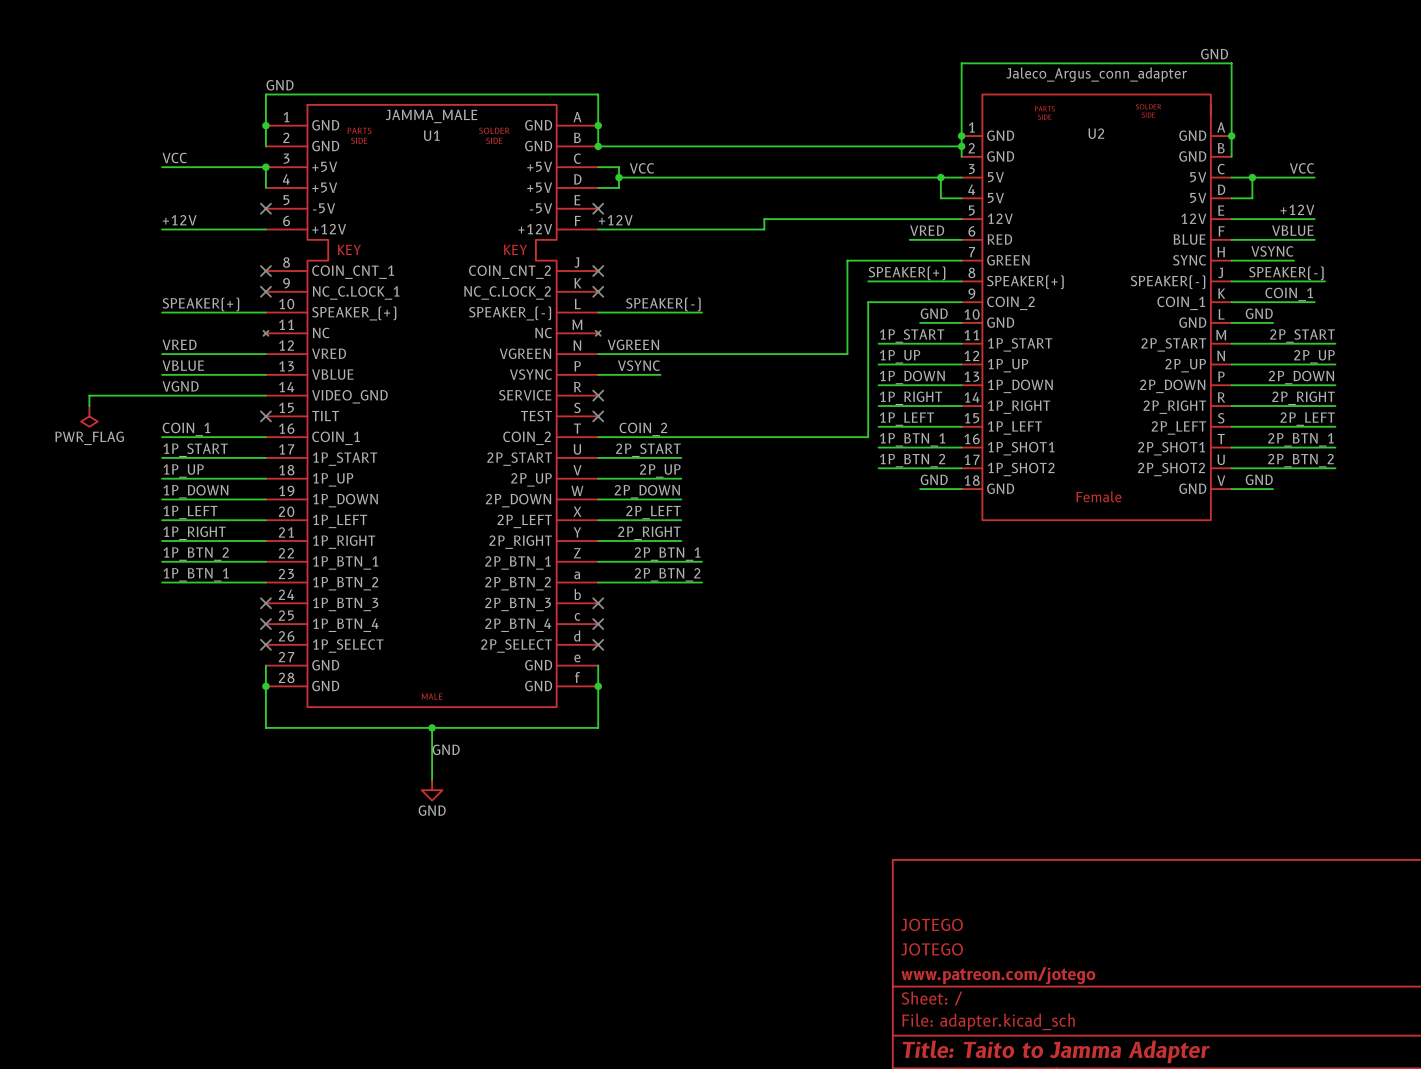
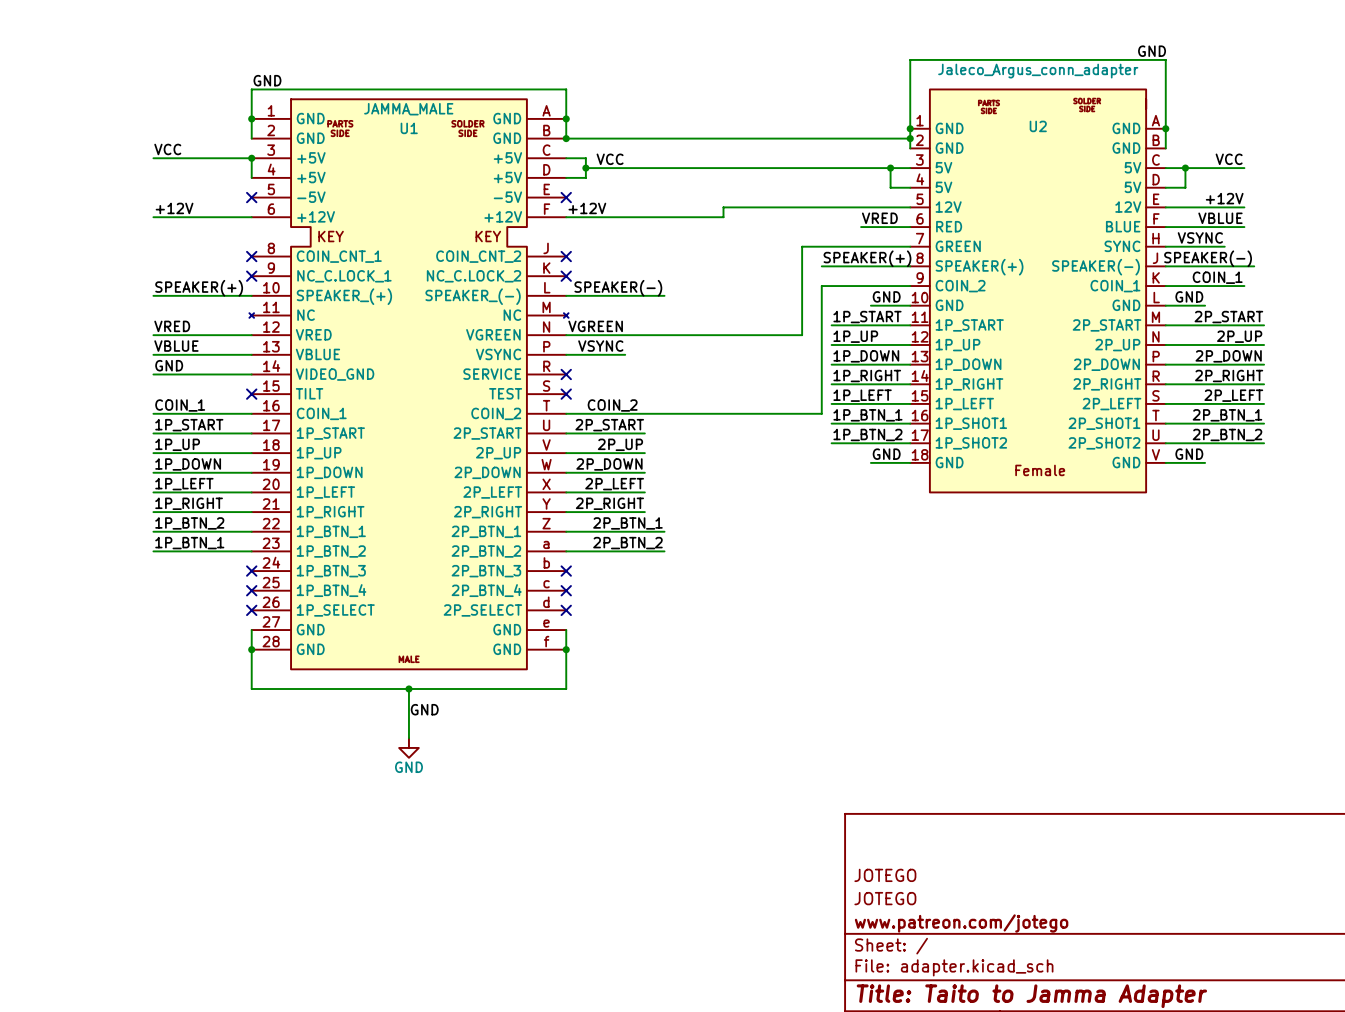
label: VGND (180, 386) -> GND (169, 365)
wire: (162, 395) (89, 395) (89, 406) -> none
power symbol: PWR_FLAG (89, 416) -> none

